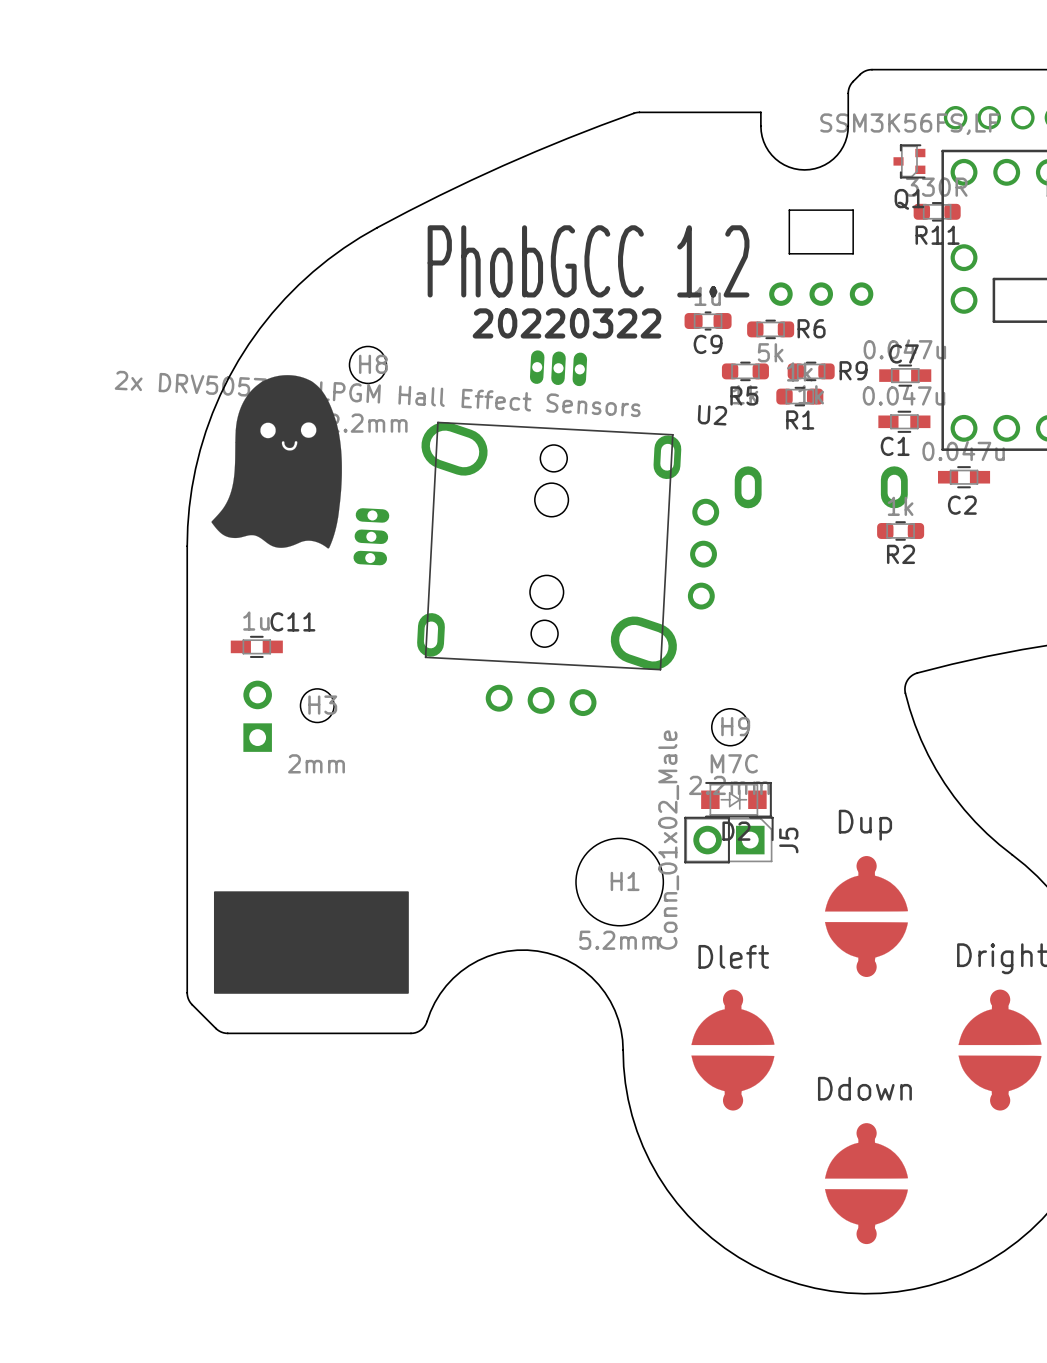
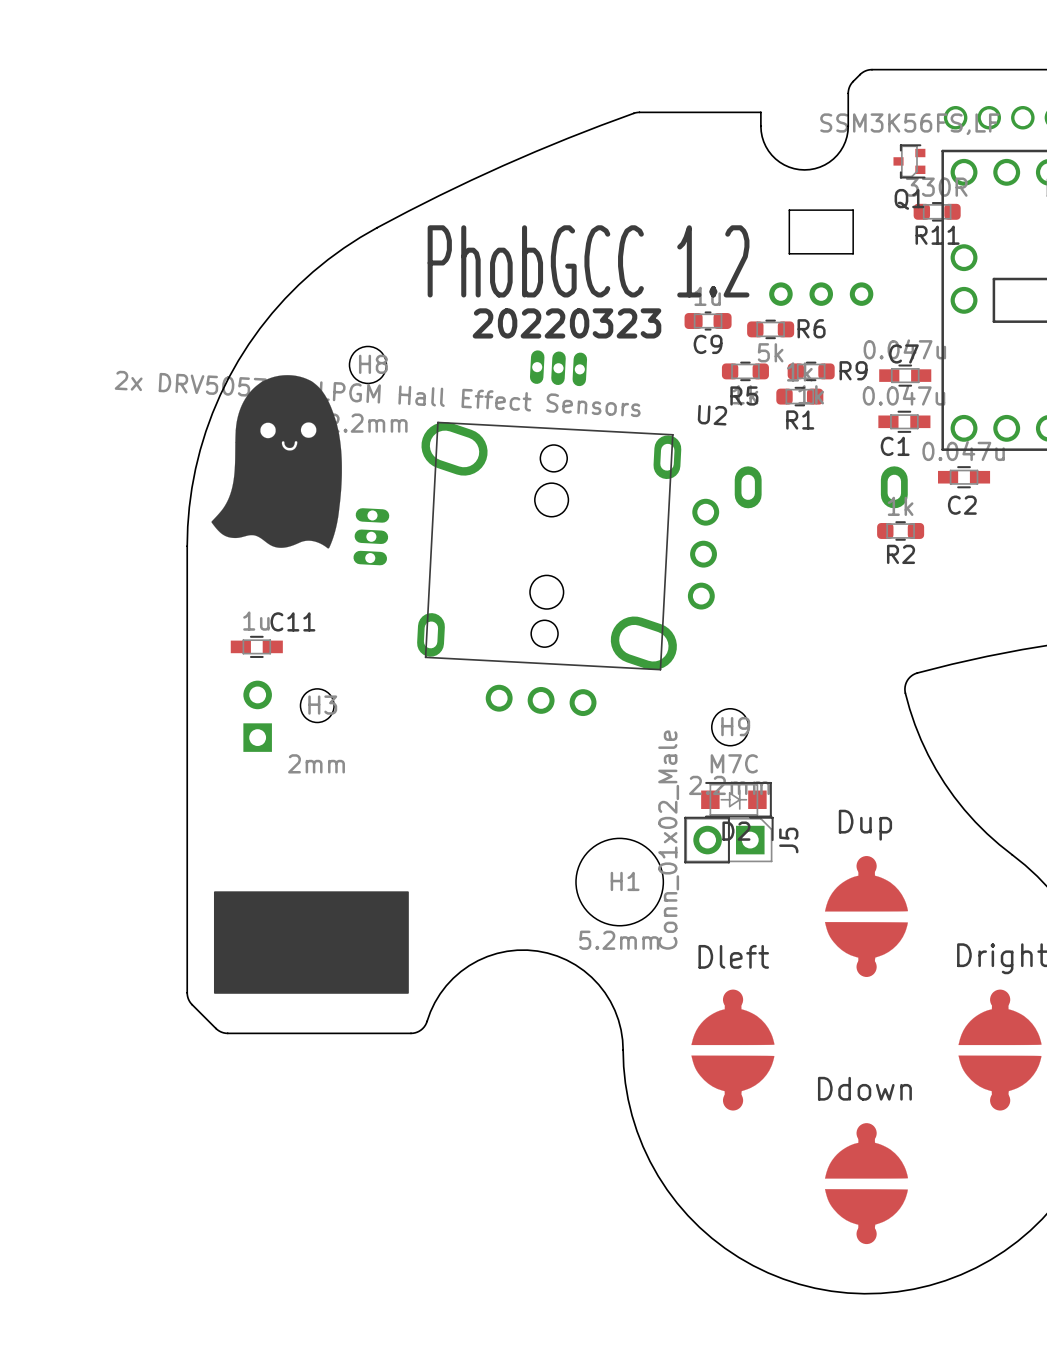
text: 20220322 (566, 323) -> 20220323 (566, 323)

